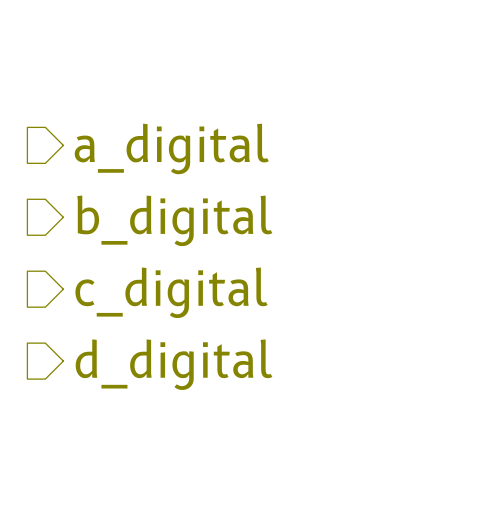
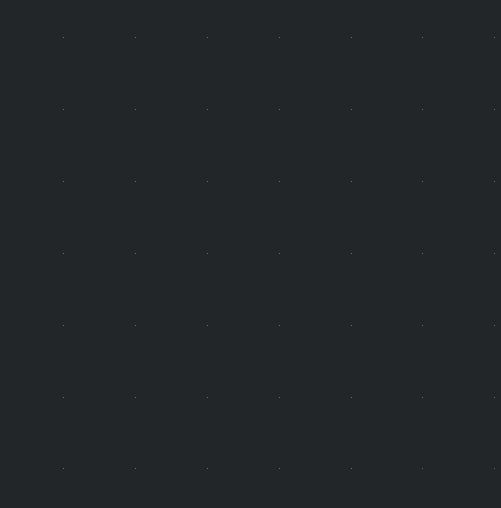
hierarchical label: a_digital (171, 148) -> none
hierarchical label: b_digital (174, 220) -> none
hierarchical label: c_digital (171, 292) -> none
hierarchical label: d_digital (173, 364) -> none

